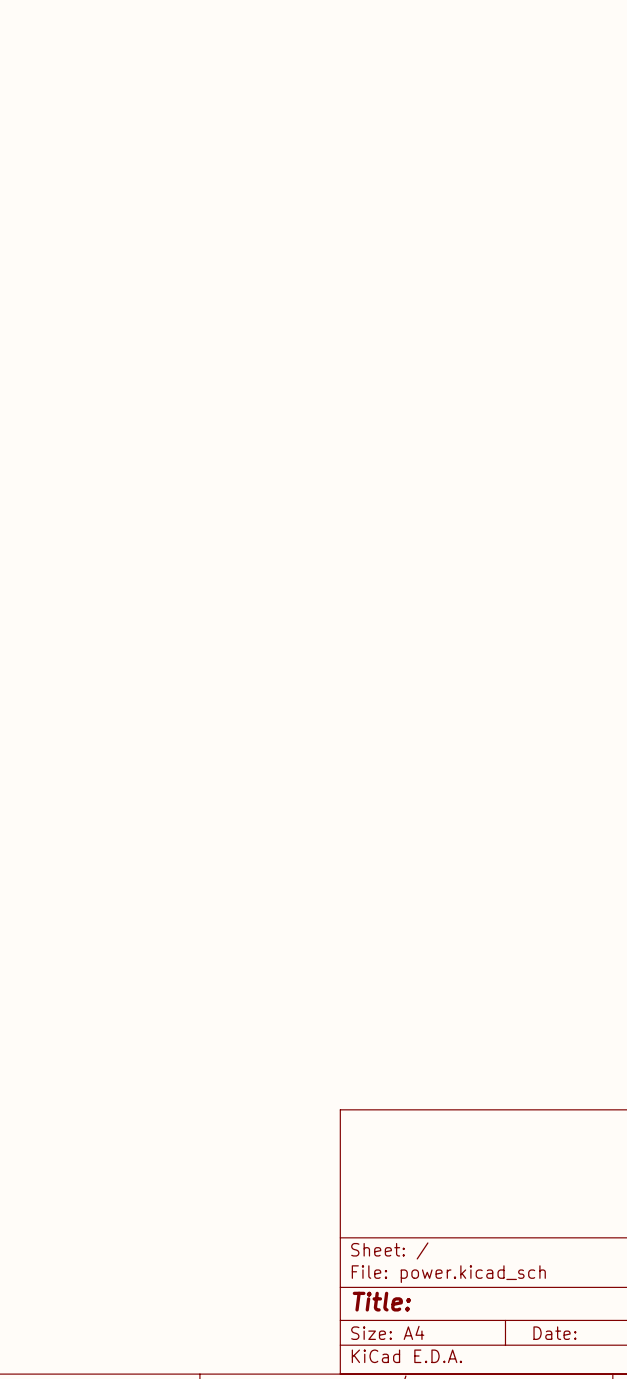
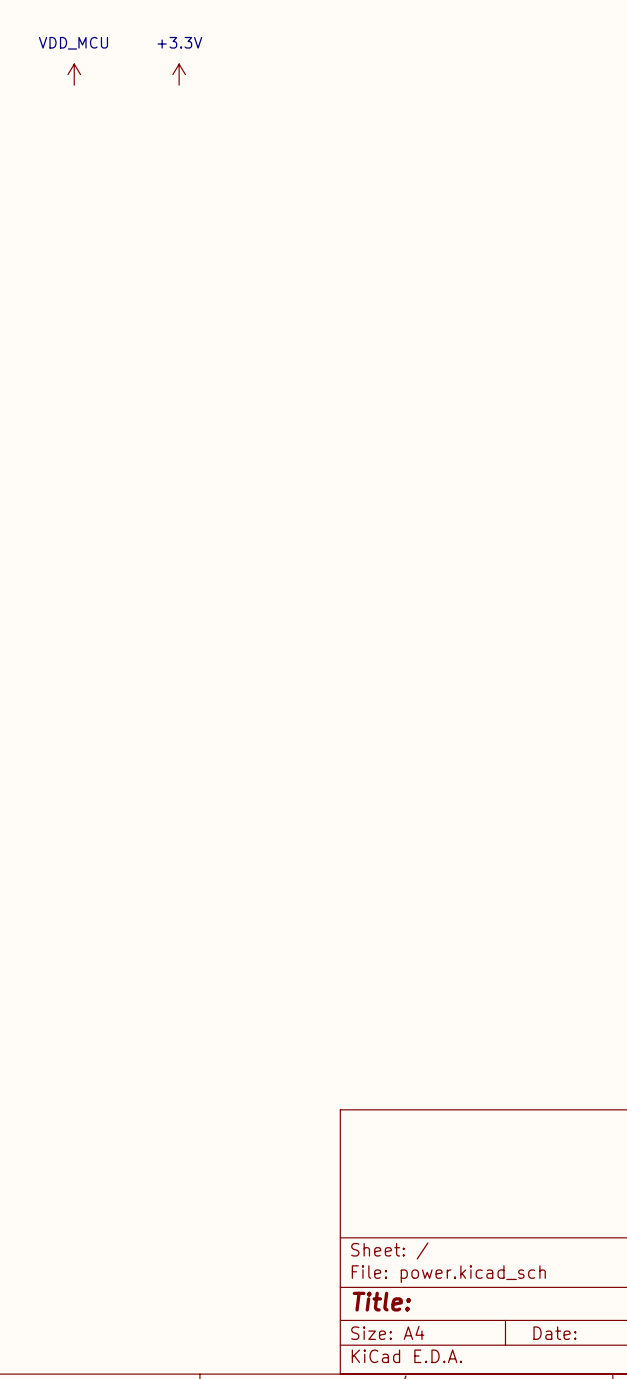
power symbol: none -> VDD_MCU (74, 74)
power symbol: none -> +3.3V (179, 74)

